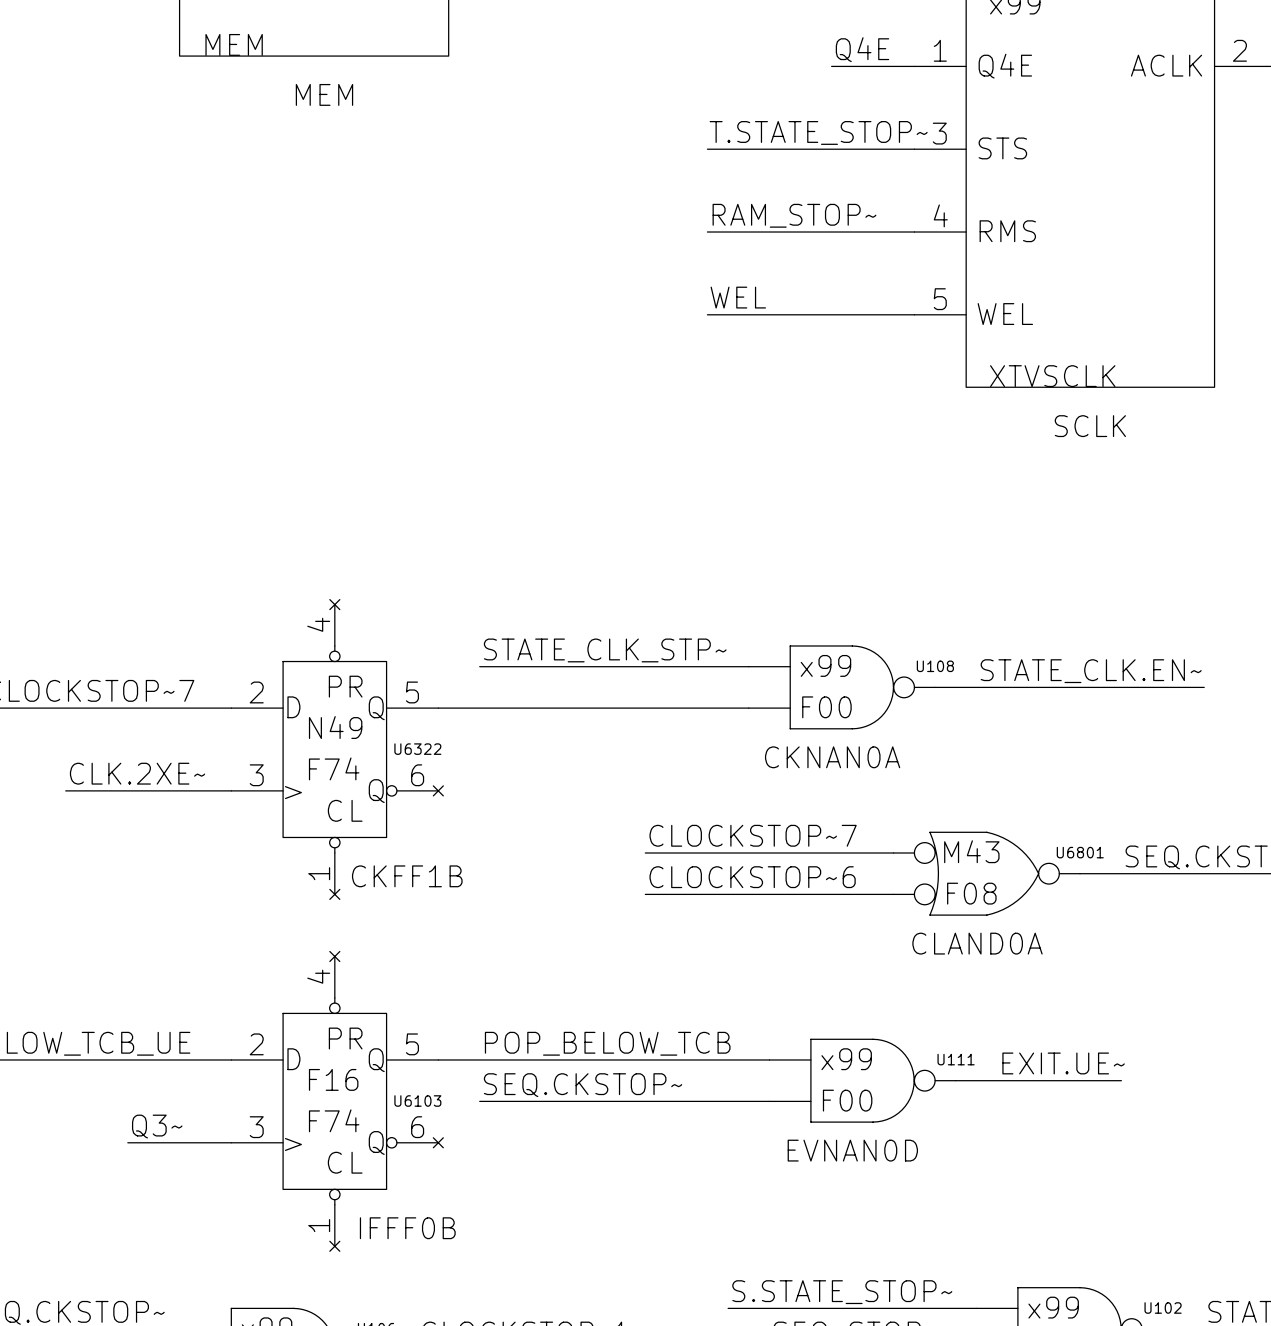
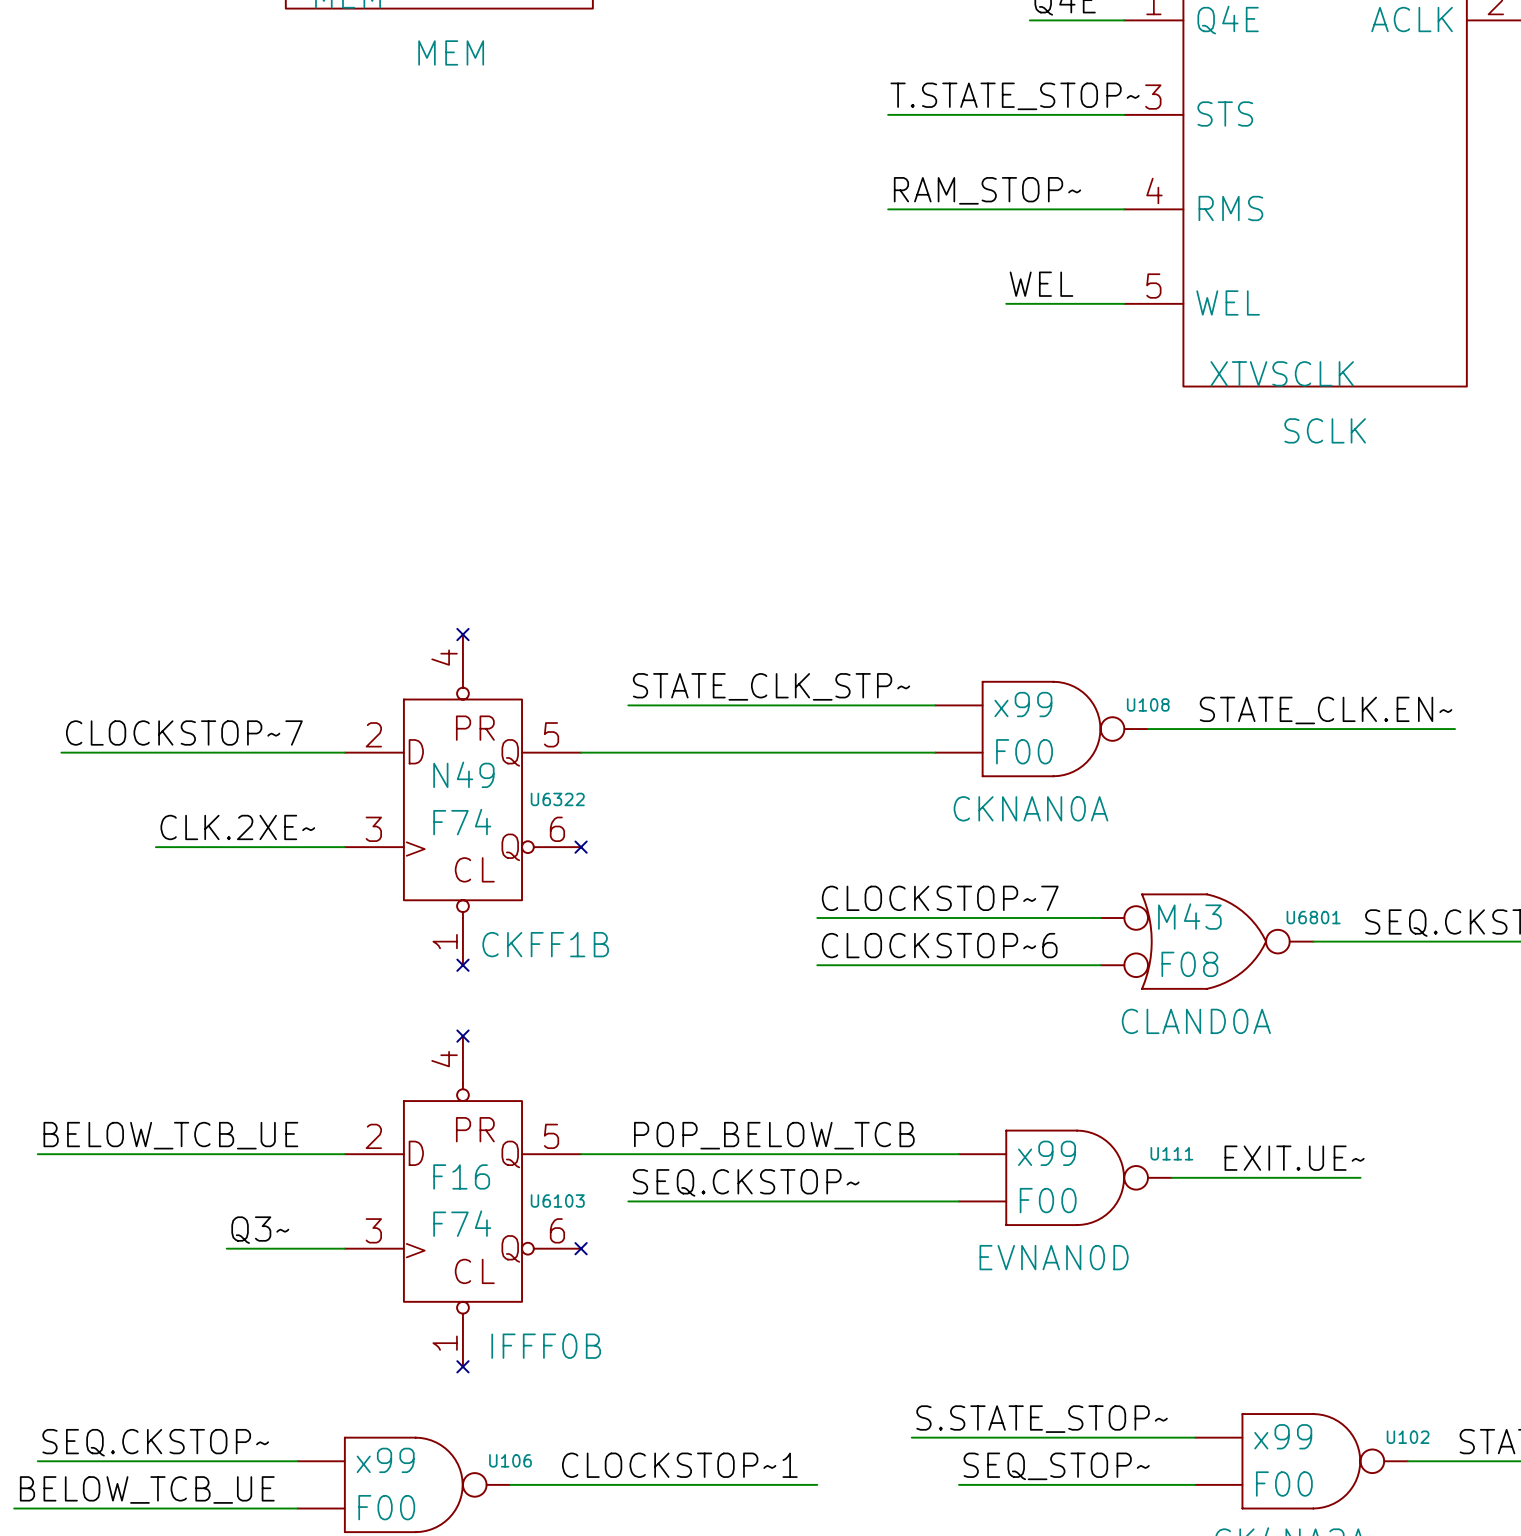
label position: WEL (738, 297) -> WEL (1041, 284)
wire: (707, 314) (810, 314) -> none

